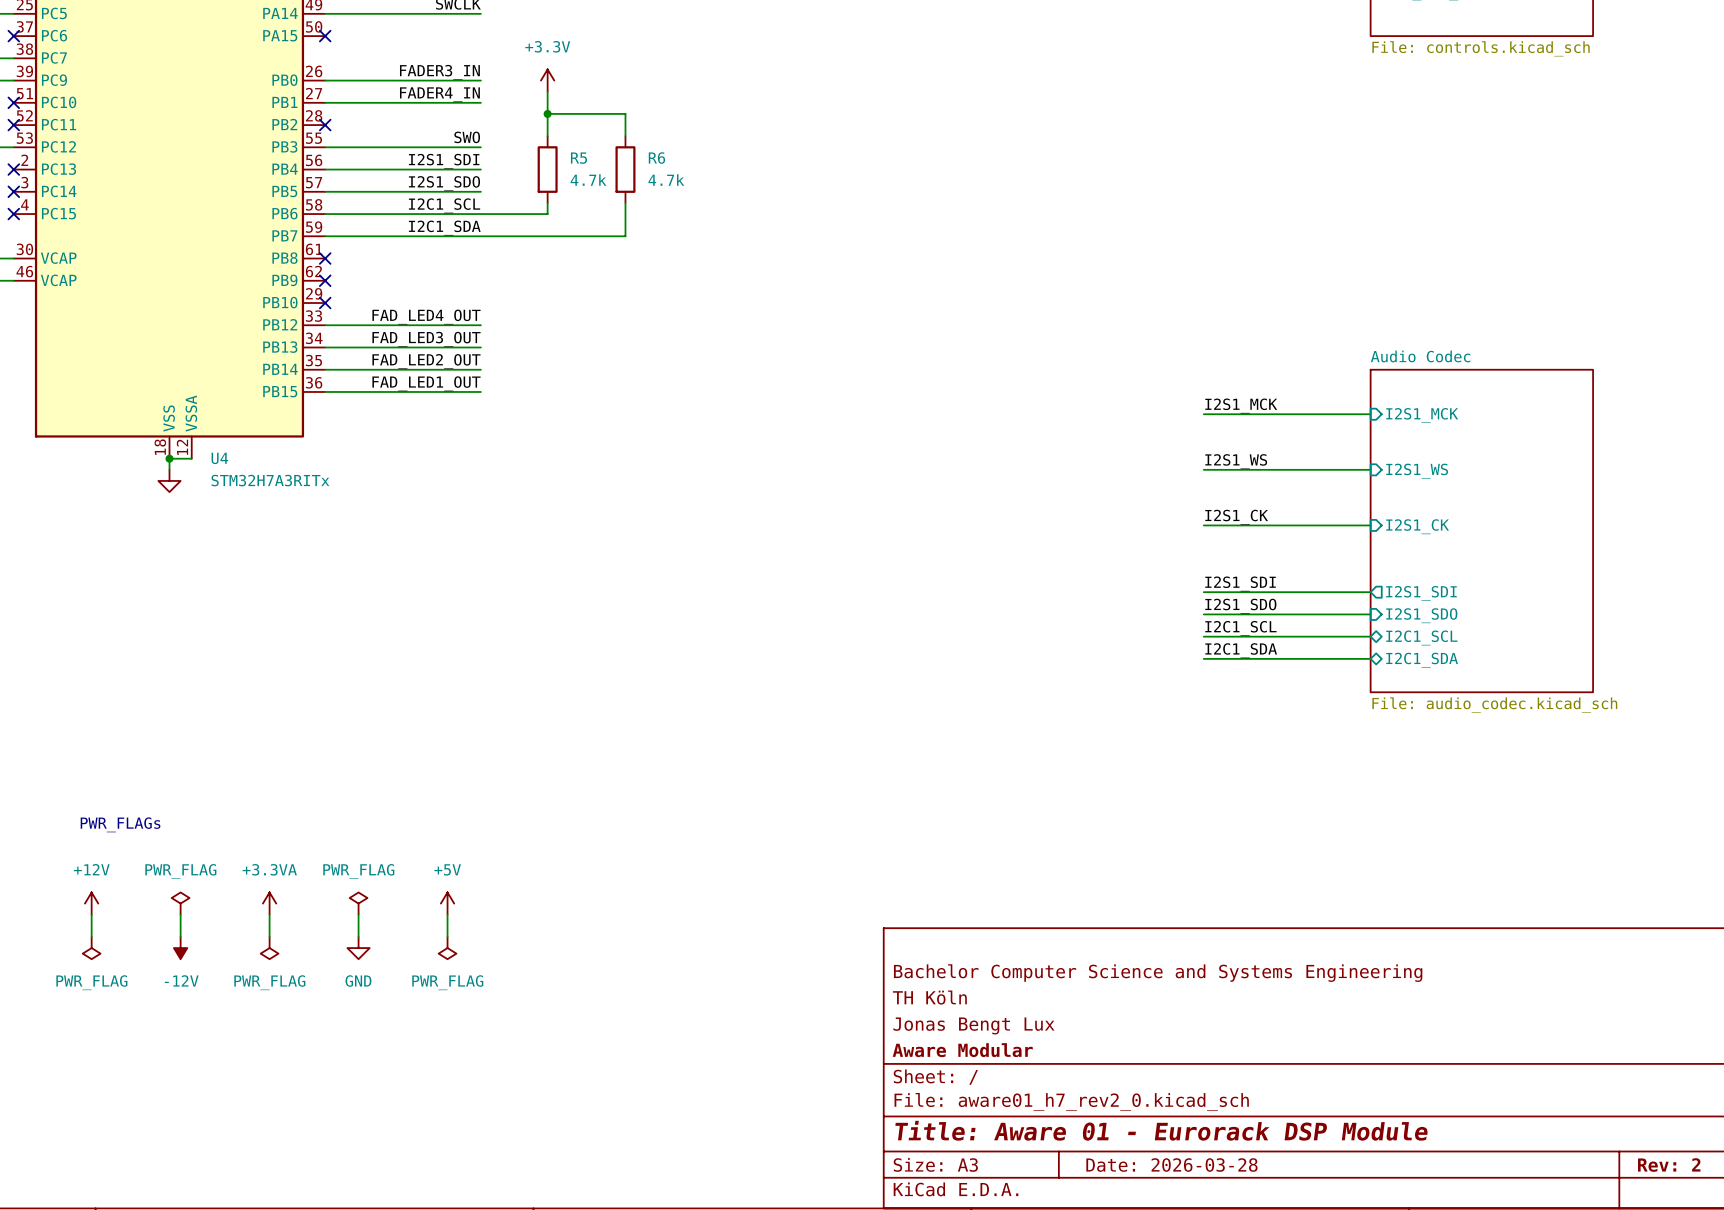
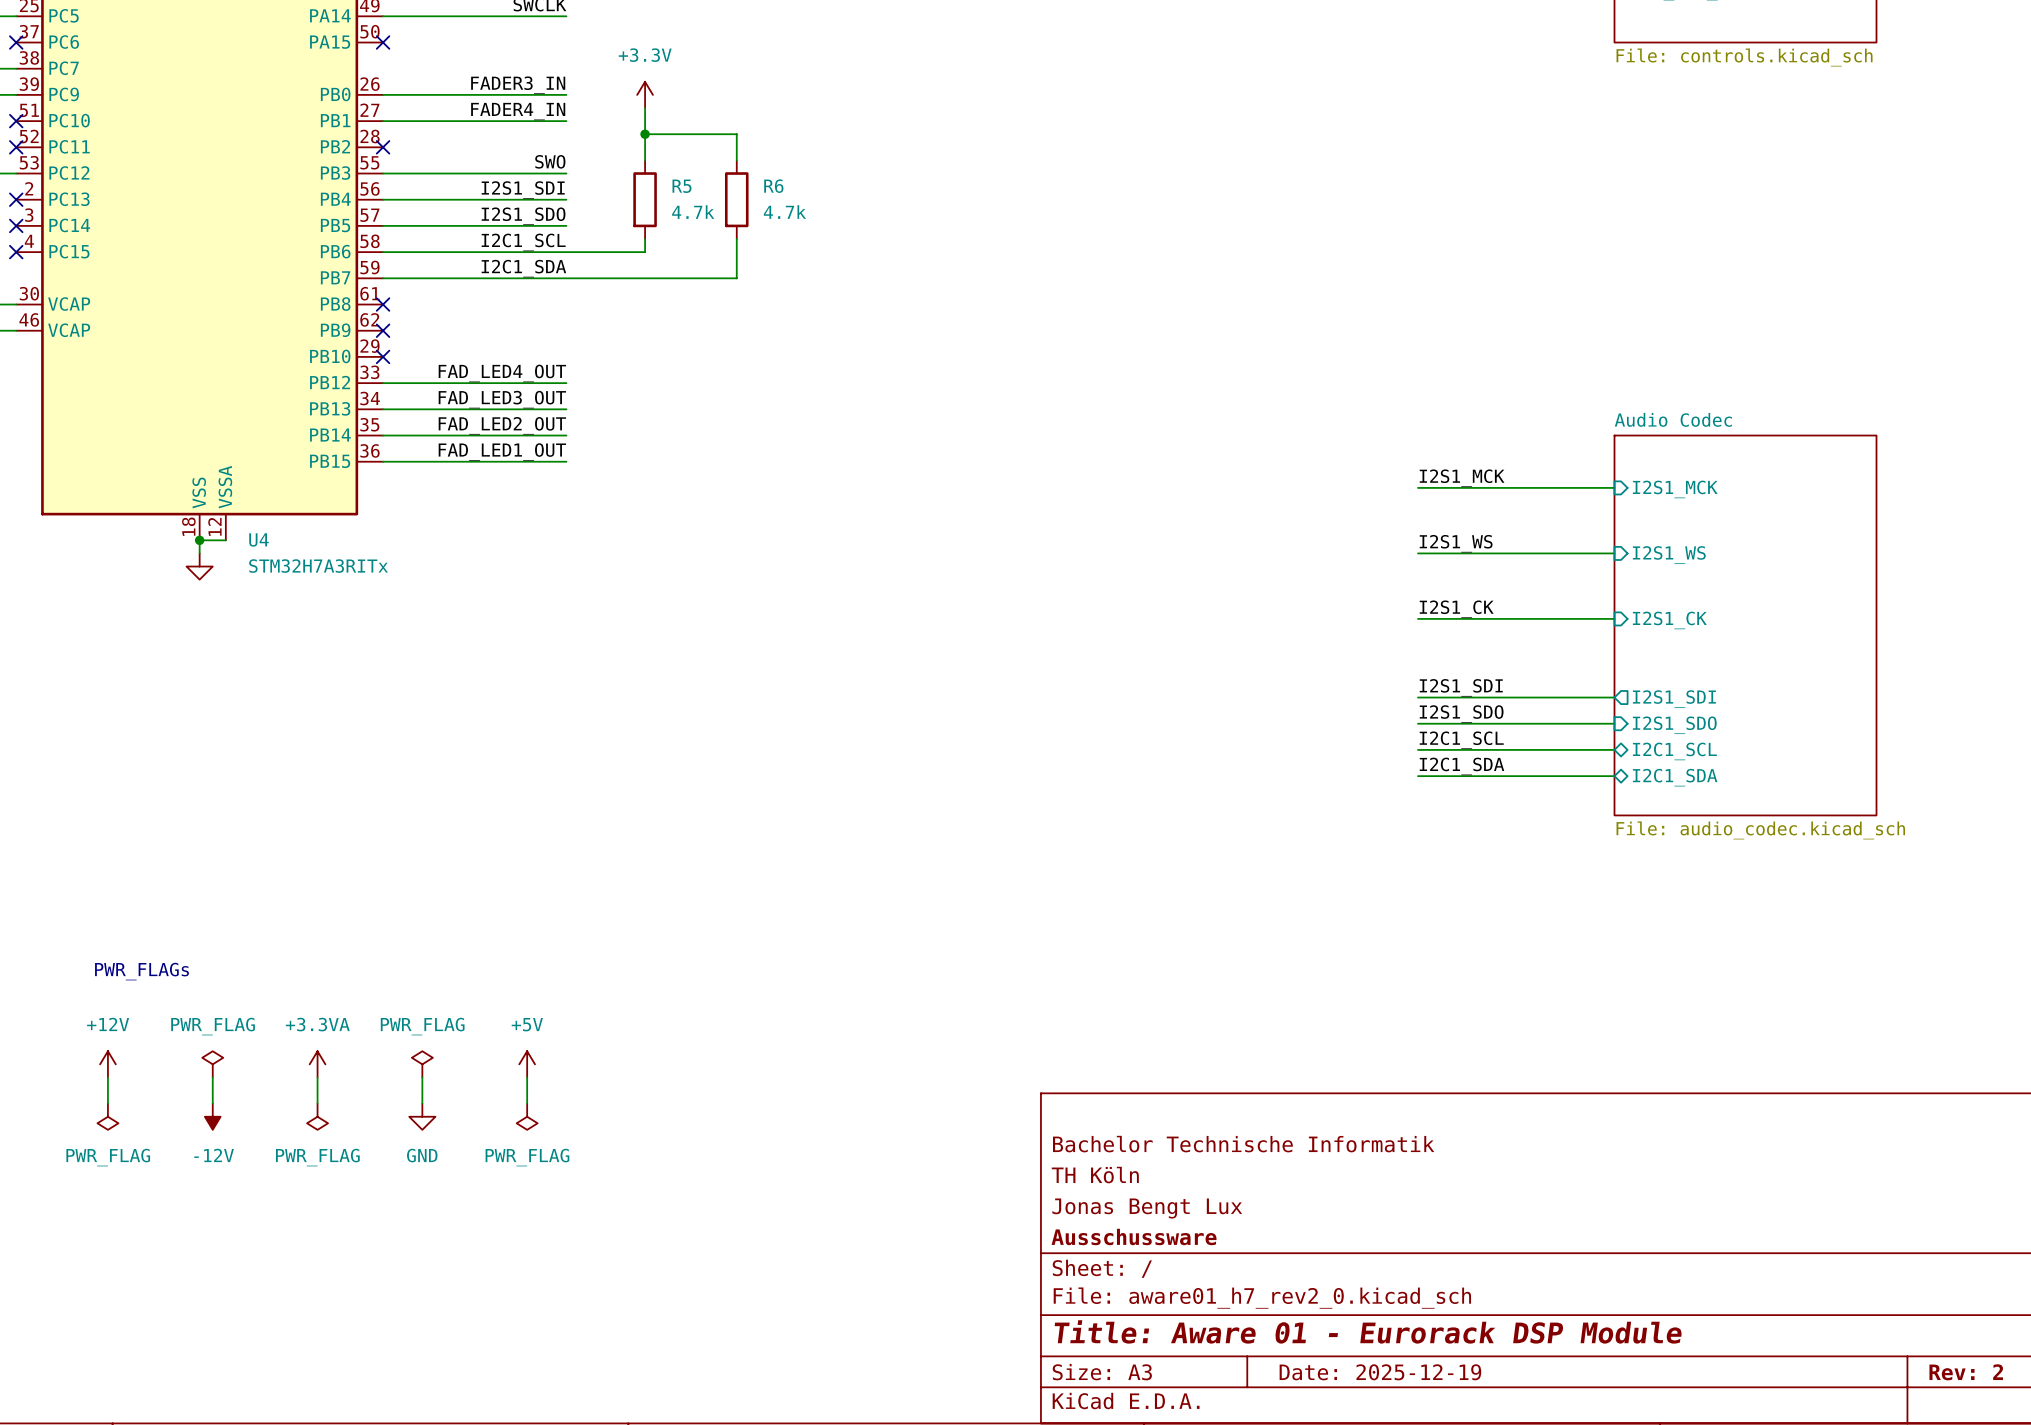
title block: Bachelor Computer Science and Systems Engineering (1158, 973) -> Bachelor Technische Informatik (1243, 1144)
title block: Aware Modular (962, 1050) -> Ausschussware (1134, 1236)
title block: Date: 2026-03-28 (1171, 1165) -> Date: 2025-12-19 (1380, 1372)

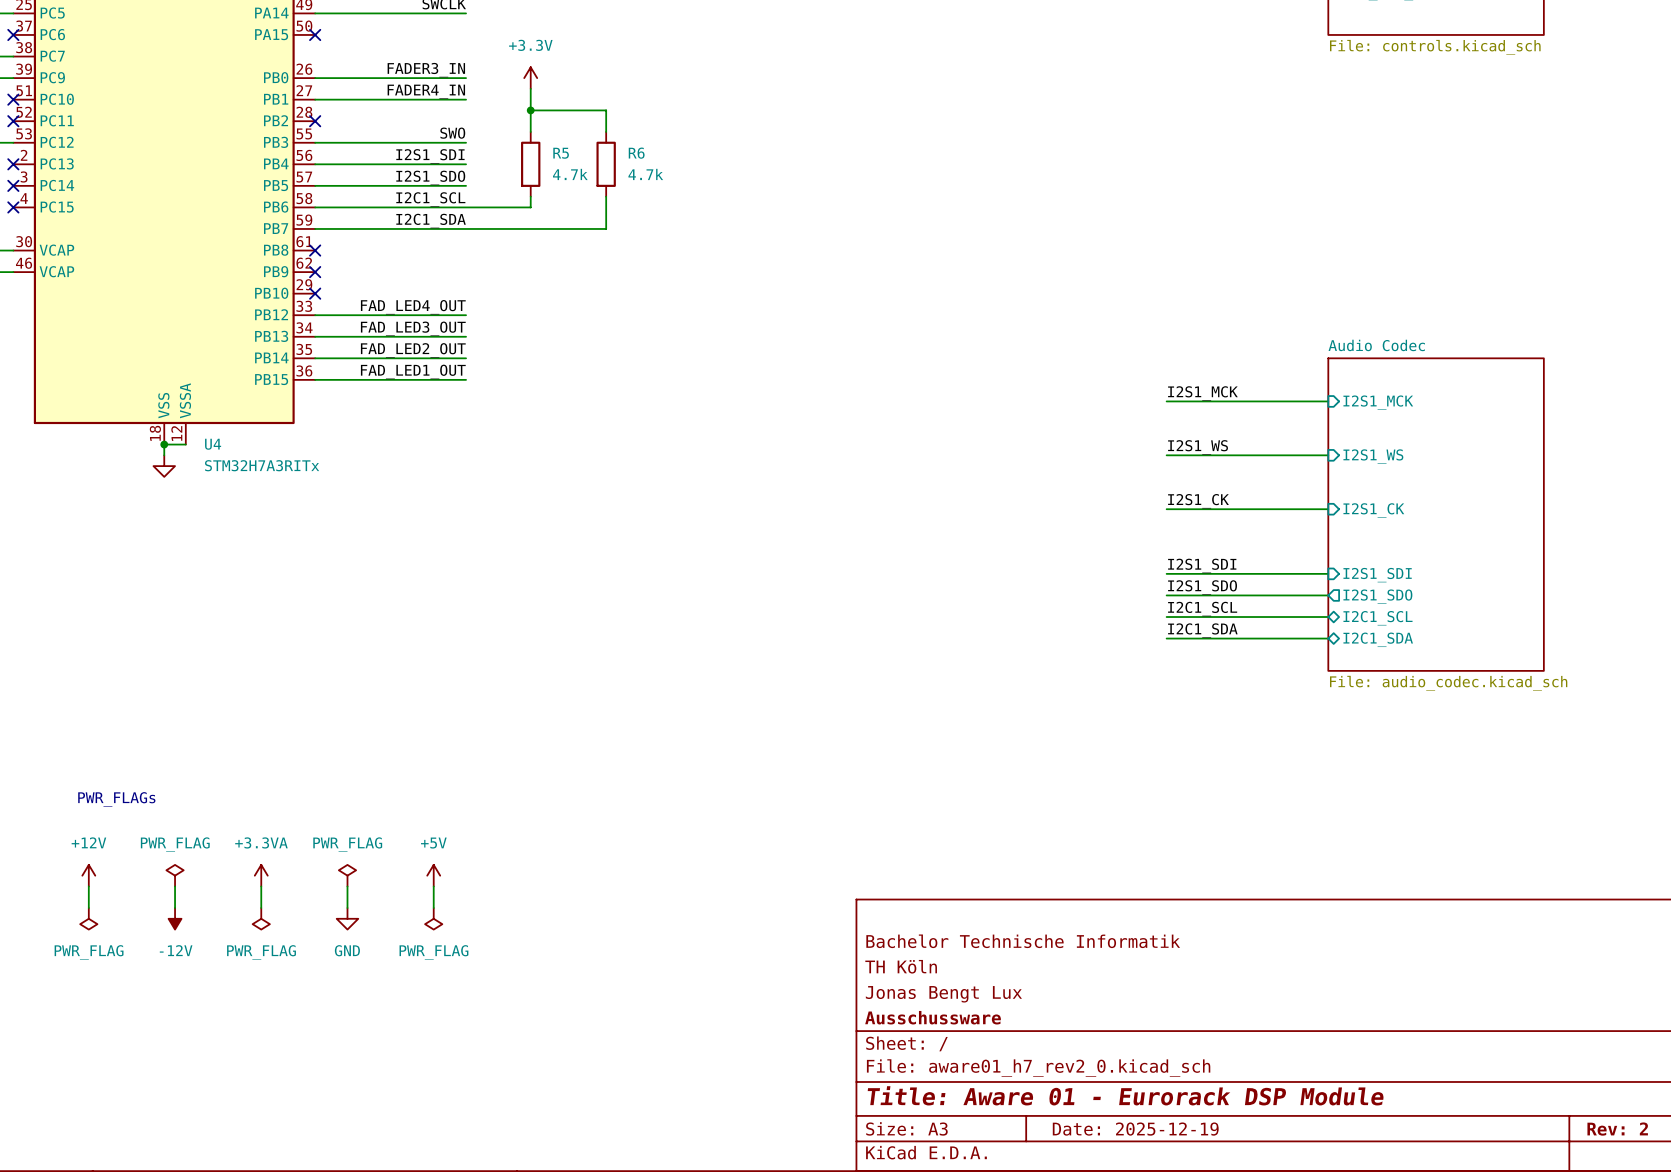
sheet pin shape: output (1674, 699) -> input (1377, 575)
sheet pin shape: input (1674, 725) -> output (1377, 596)

